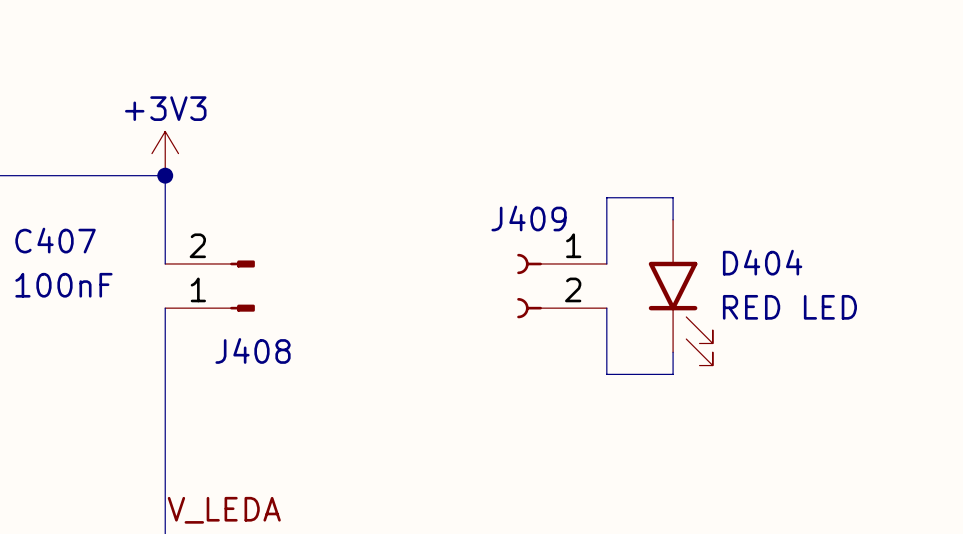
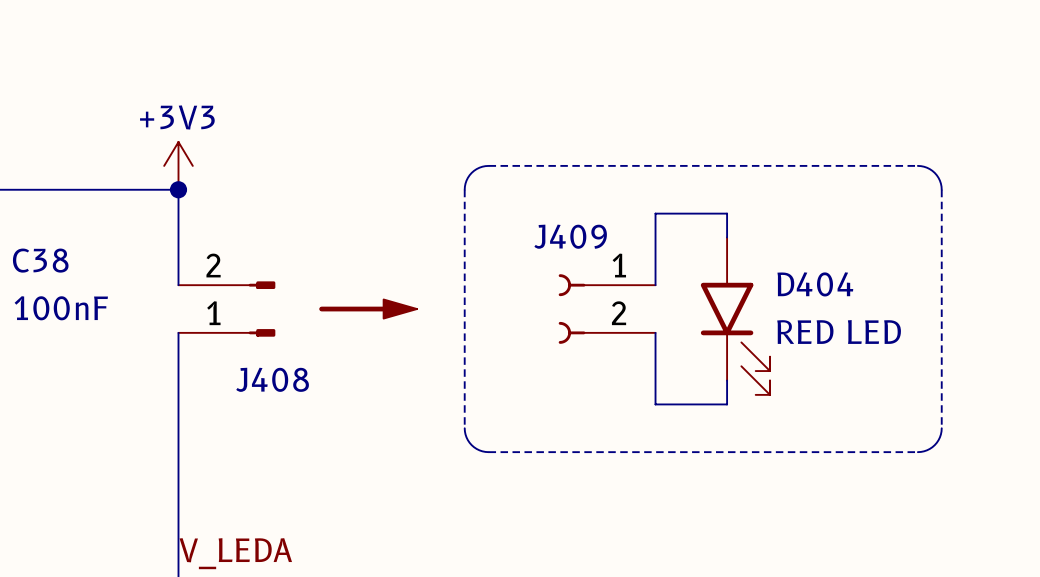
line: none -> (488, 165) (917, 165) (929, 169) (938, 177) (941, 189) (941, 428) (938, 440) (929, 448) (917, 452) (488, 452) (476, 448) (467, 440) (464, 428) (464, 189) (466, 180) (471, 172) (479, 167) (488, 165)
C407 name: C407 (55, 240) -> C38 (40, 260)
power symbol: none -> (368, 309)

